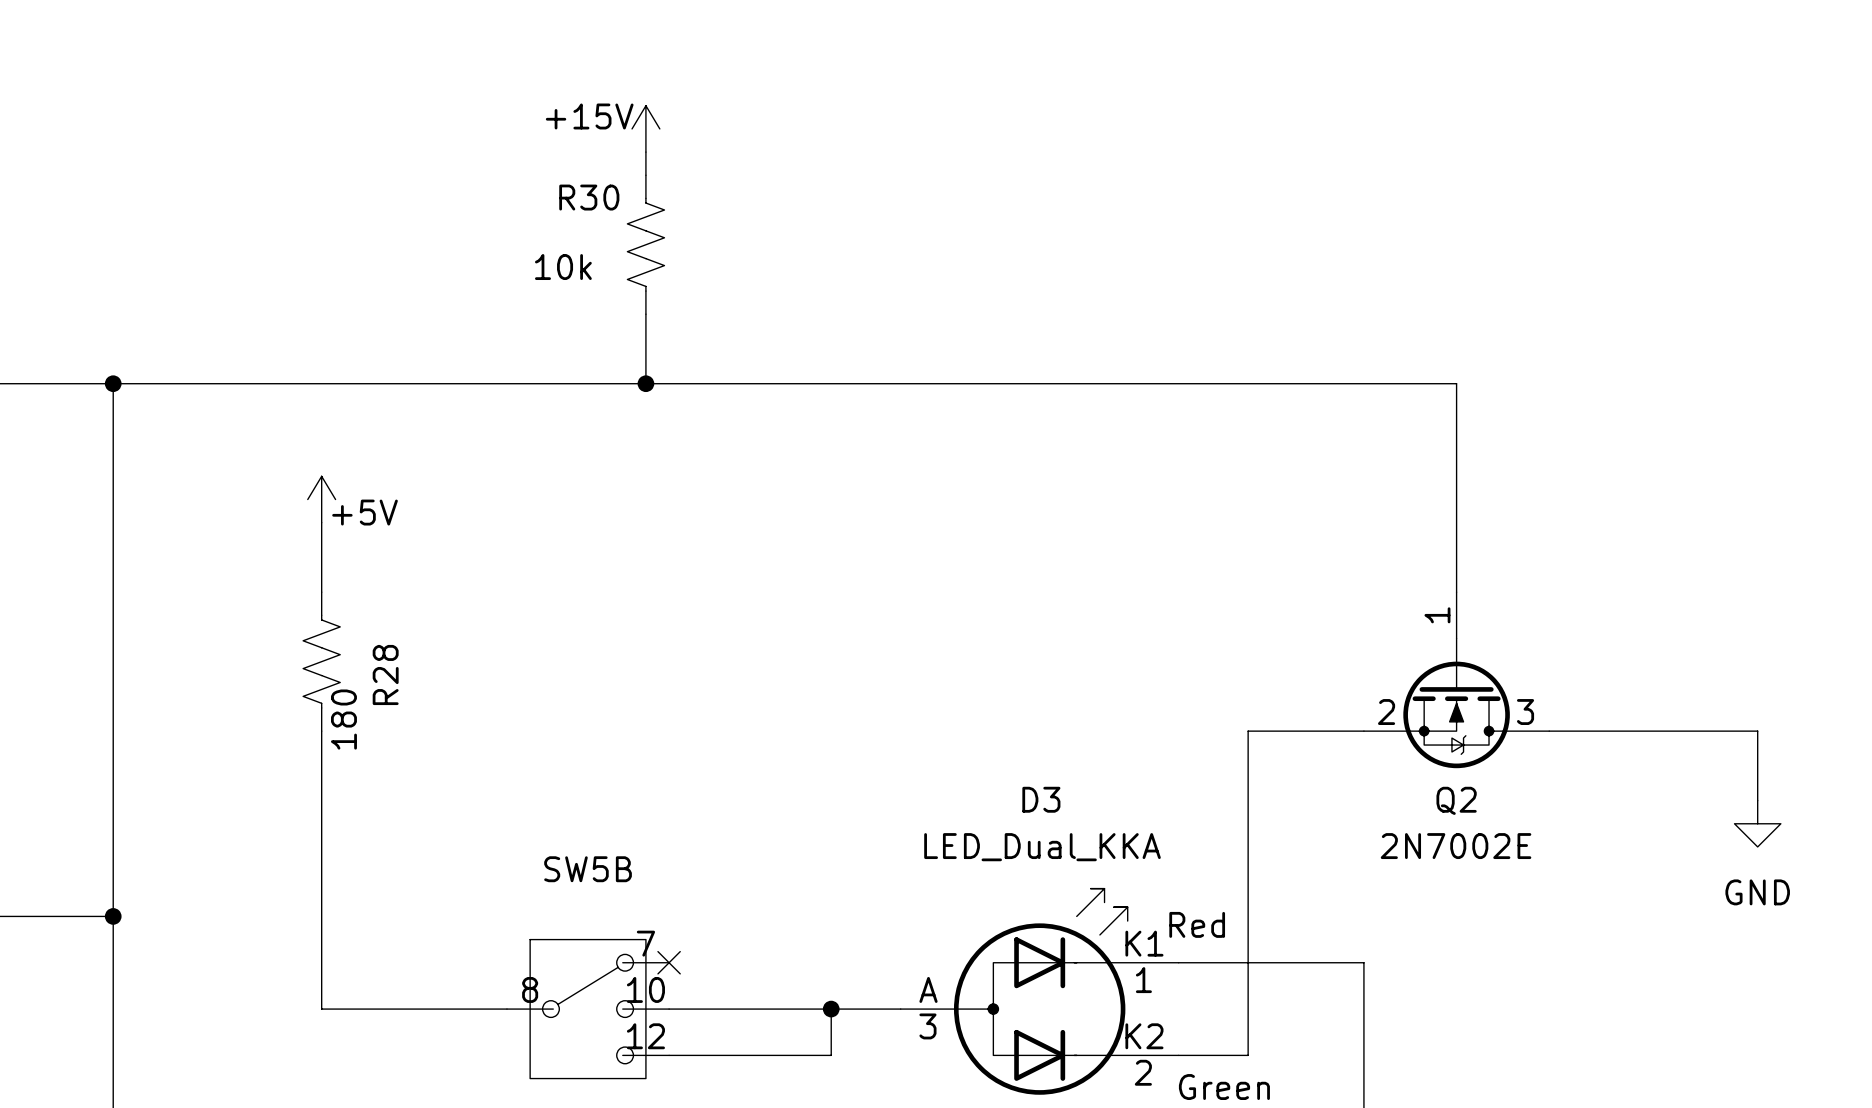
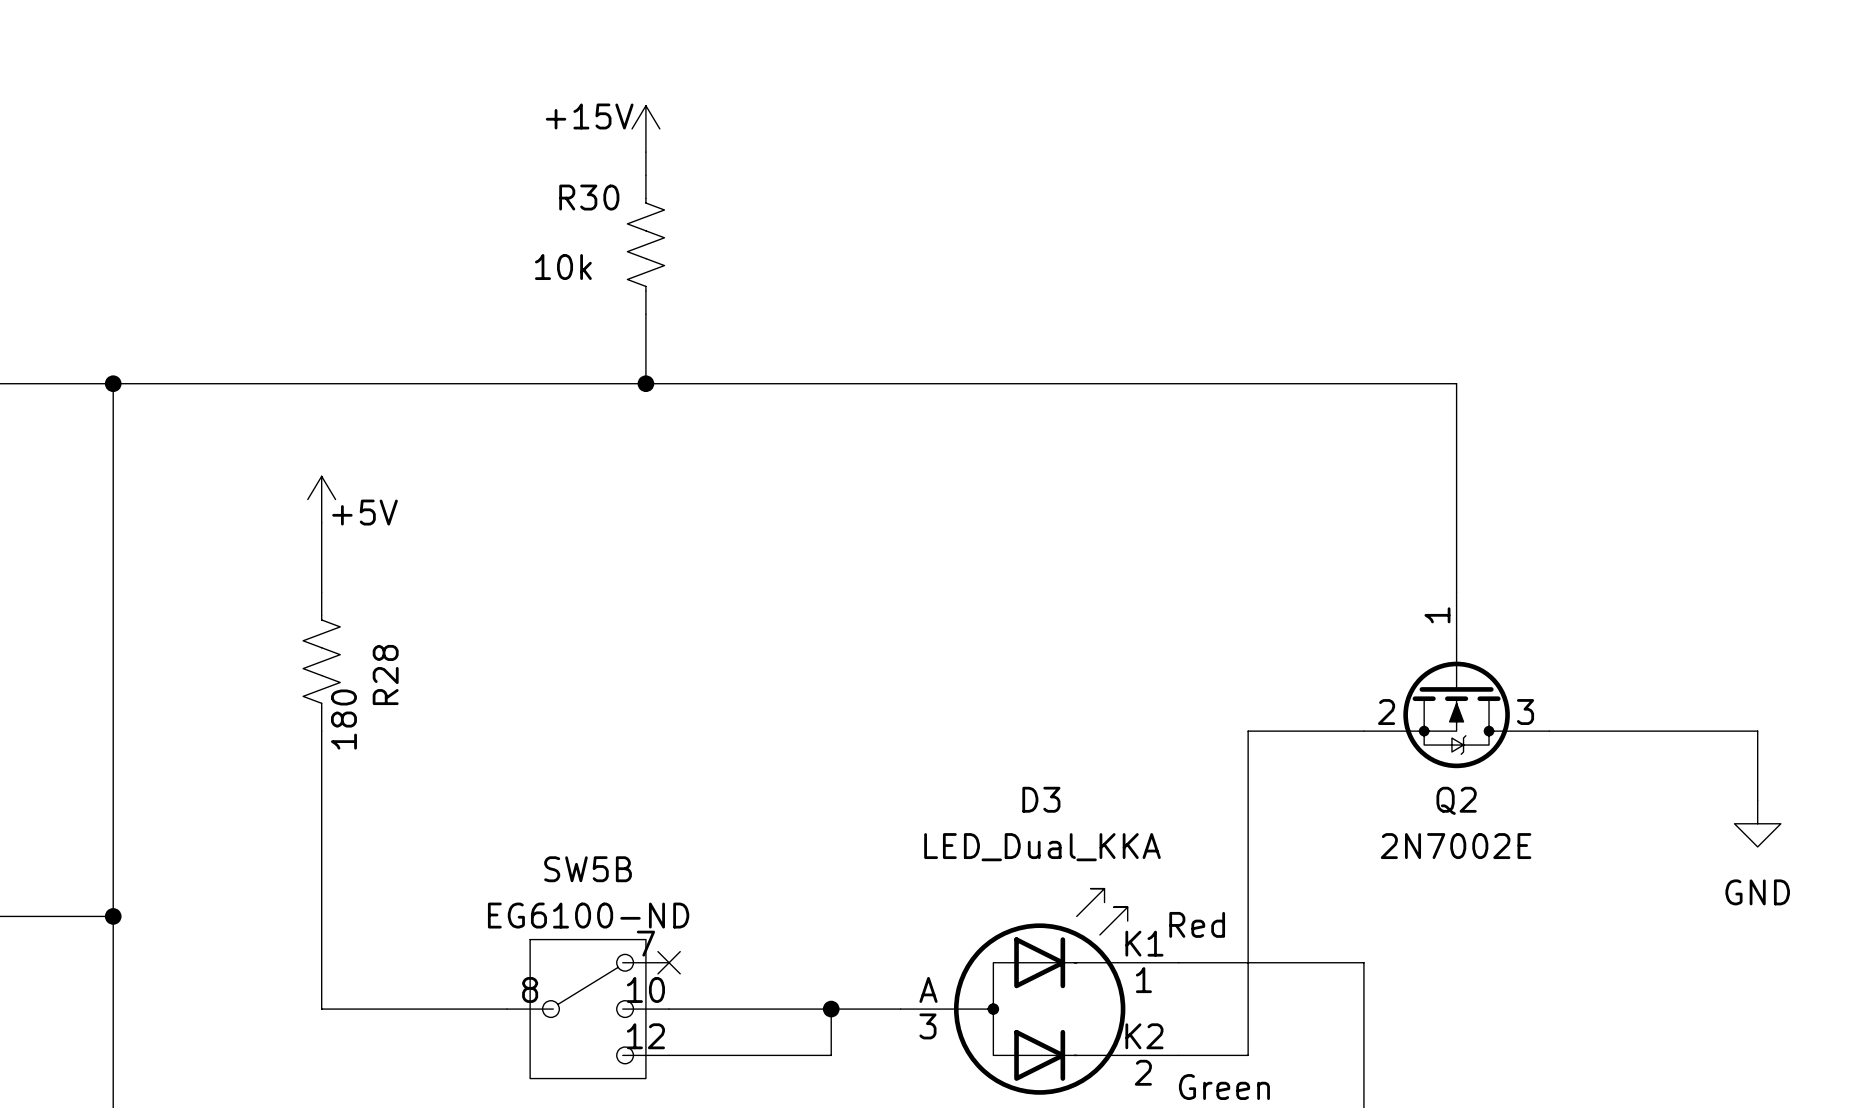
SW5B value: none -> EG6100-ND (588, 915)

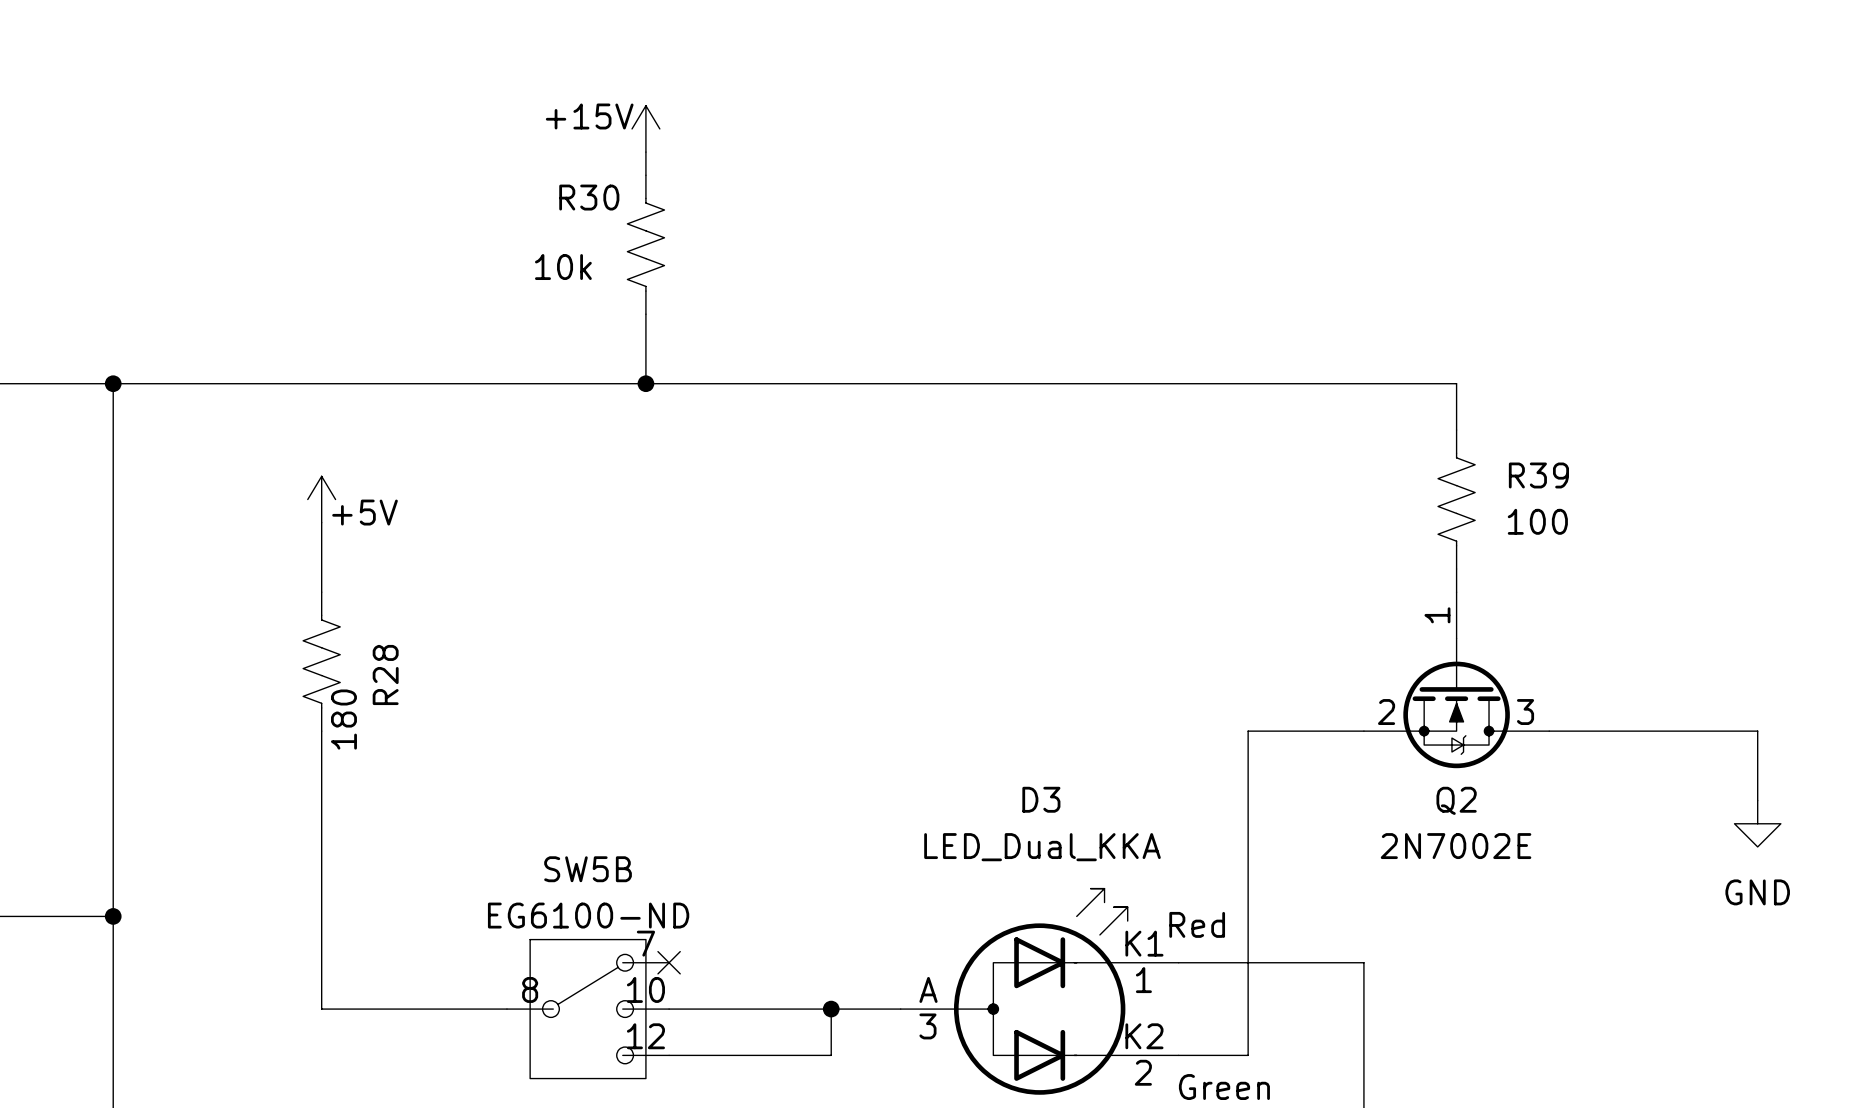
wire: (1456, 430) (1456, 569) -> none
R39: none -> 100 (1456, 499)

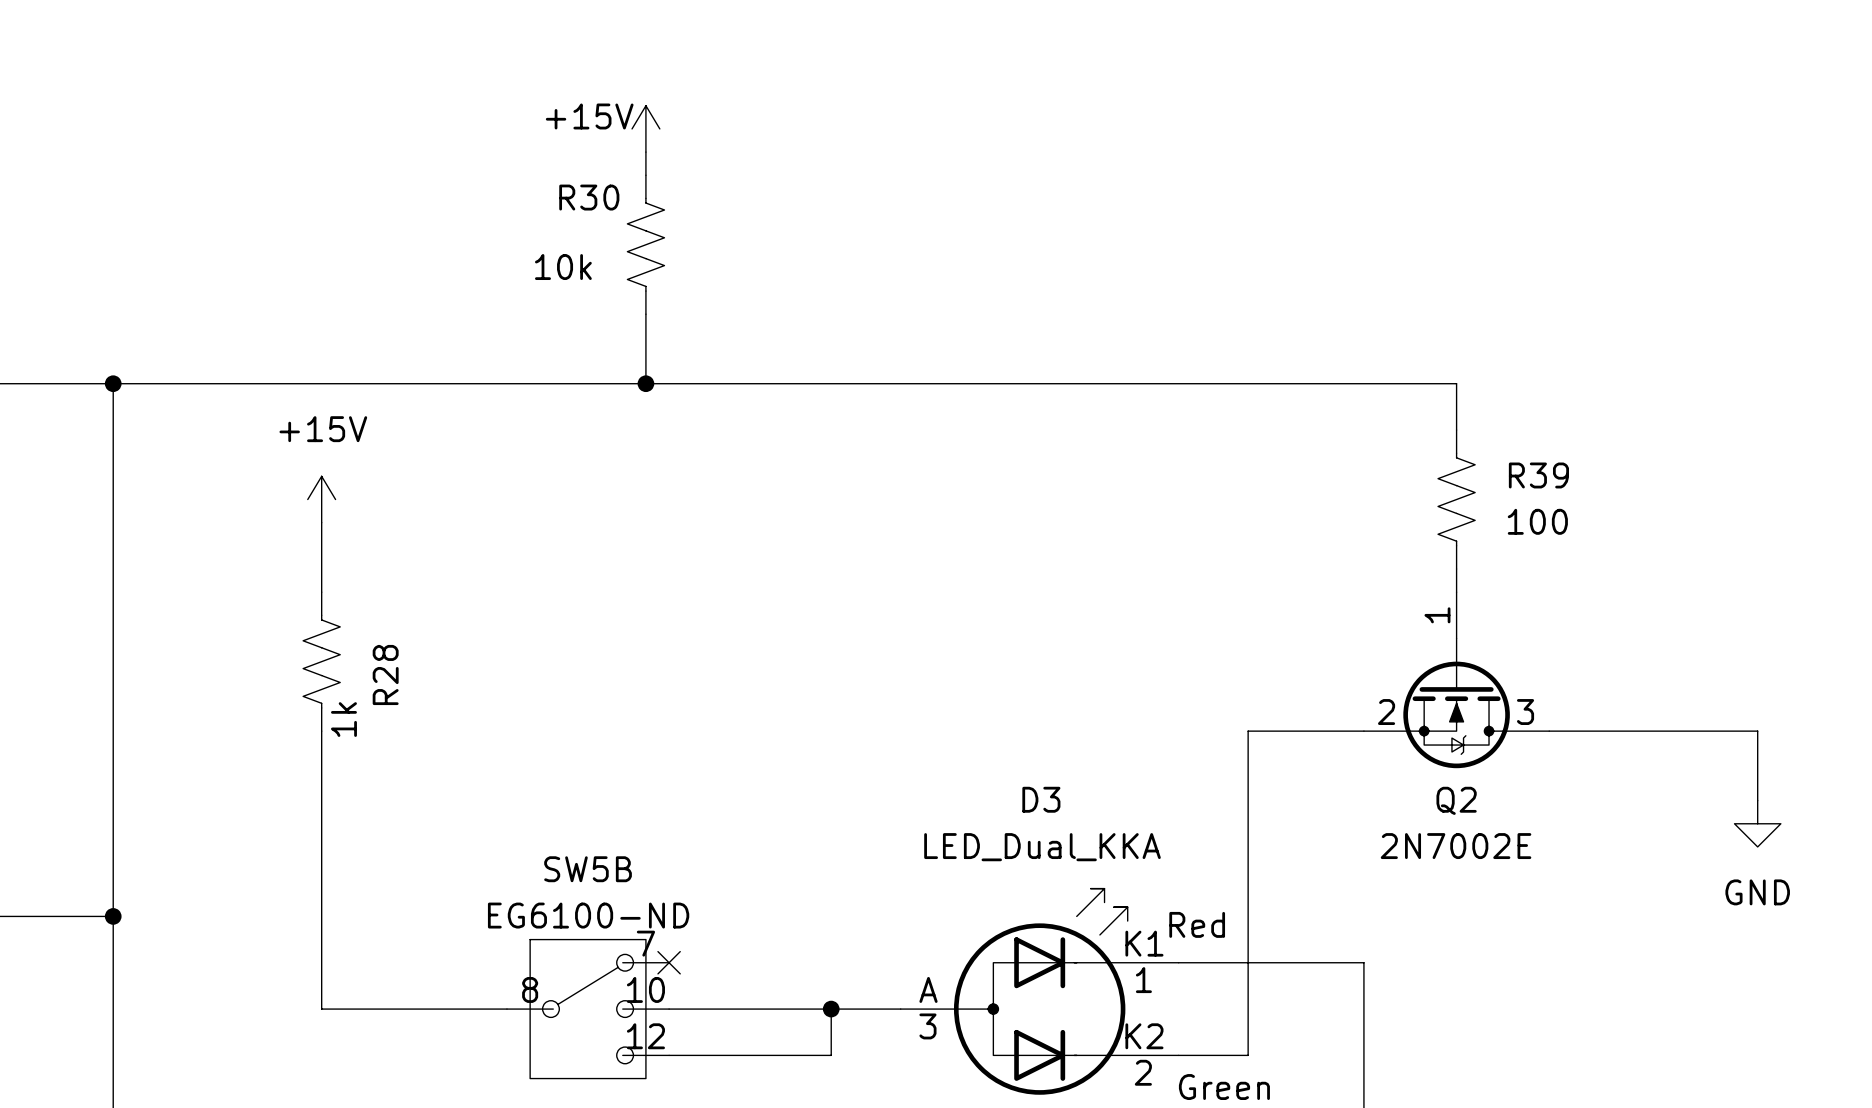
power symbol: +5V (321, 499) -> +15V (321, 499)
R28 value: 180 (343, 719) -> 1k (343, 719)

